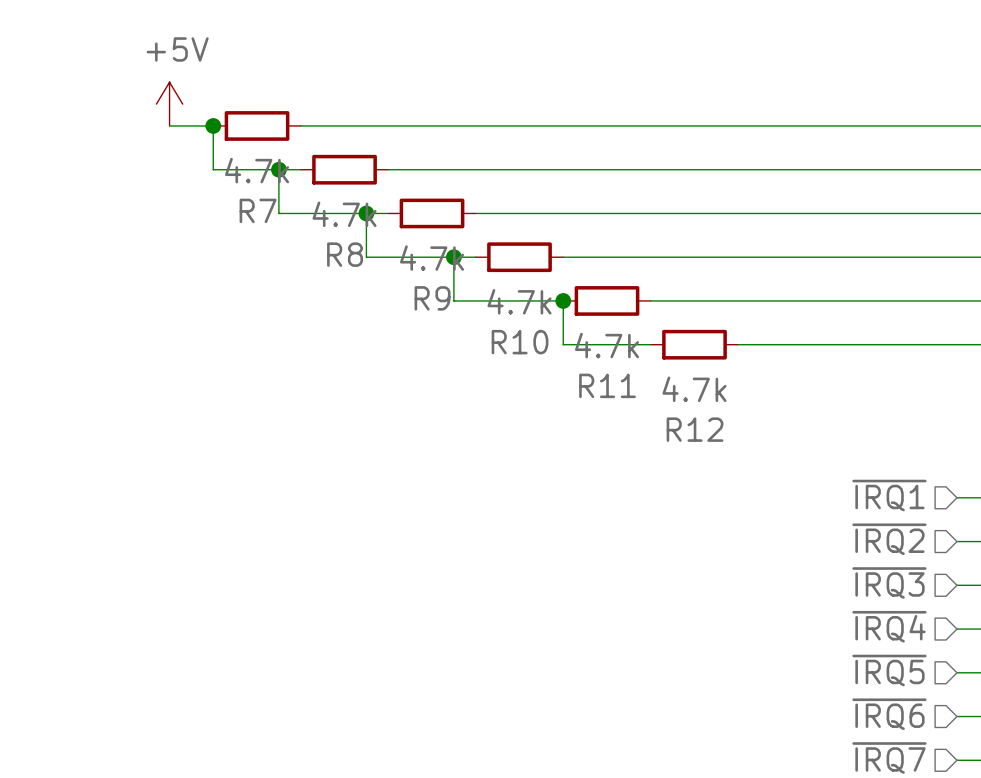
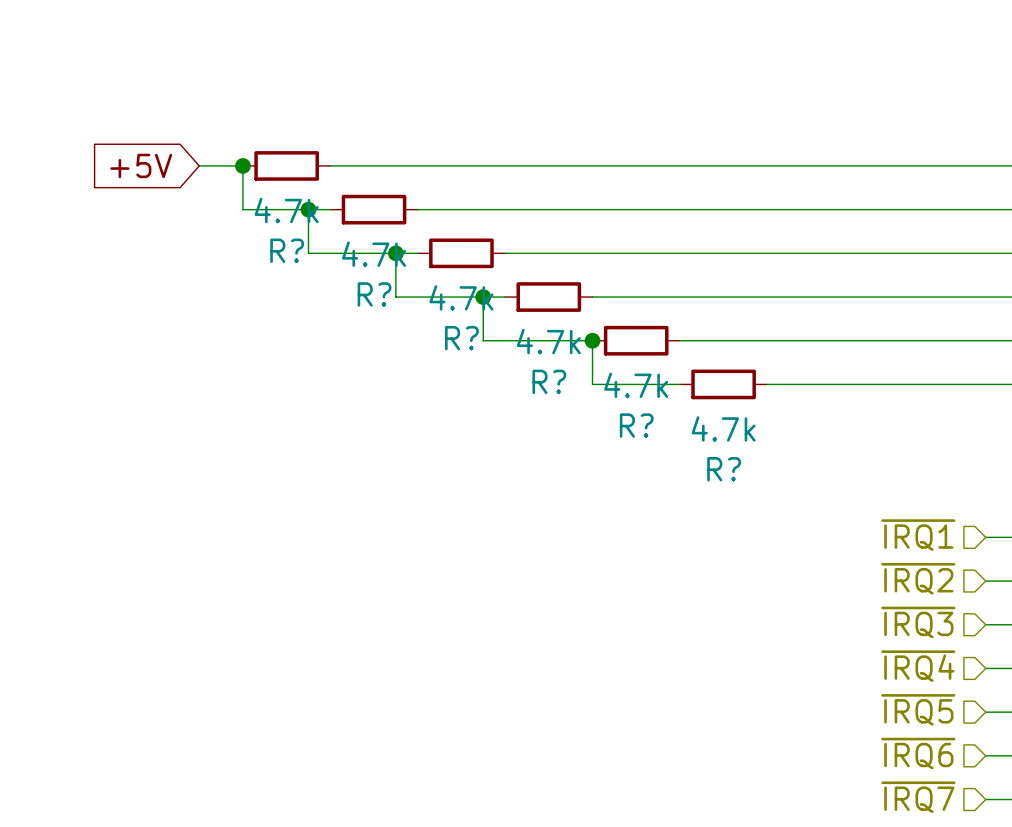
power symbol: +5V (169, 104) -> none
global label: none -> +5V (141, 165)
R7 name: R7 (258, 210) -> R? (287, 250)
R8 name: R8 (345, 254) -> R? (374, 294)
R9 name: R9 (432, 298) -> R? (461, 338)
R10 name: R10 (520, 342) -> R? (549, 381)
R11 name: R11 (607, 385) -> R? (636, 425)
R12 name: R12 (695, 429) -> R? (724, 469)

